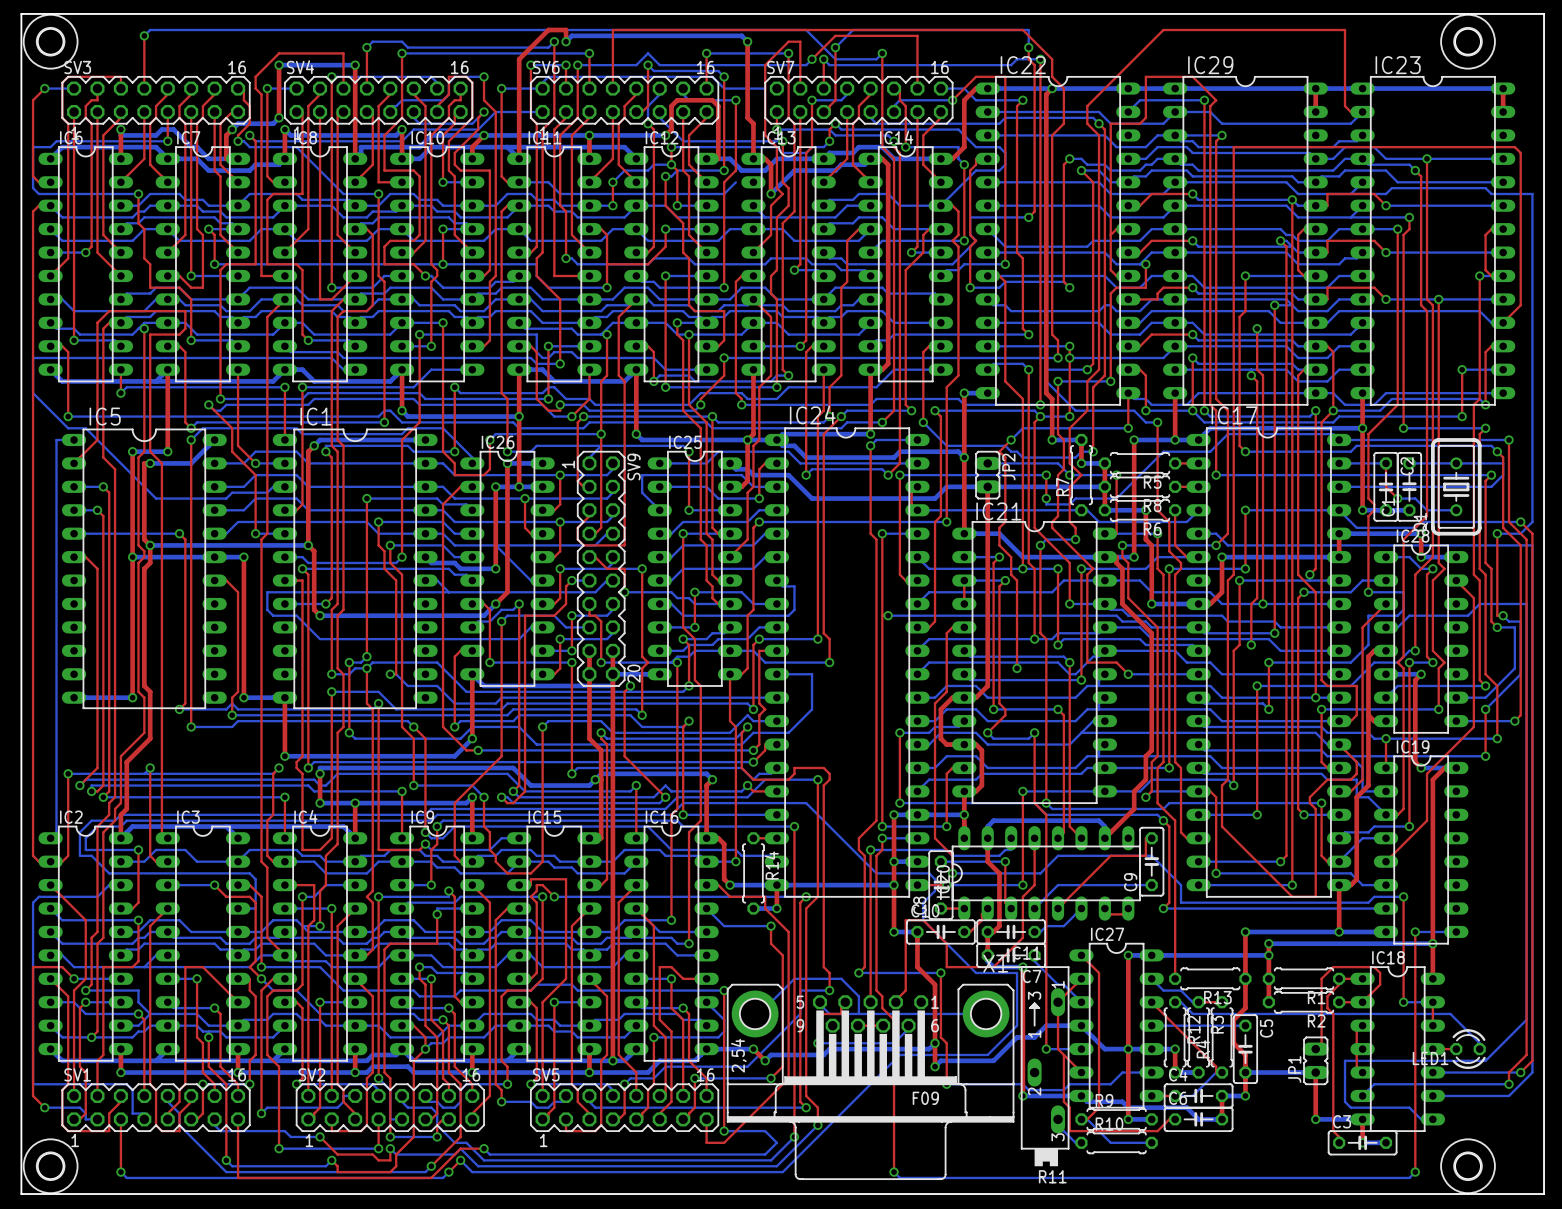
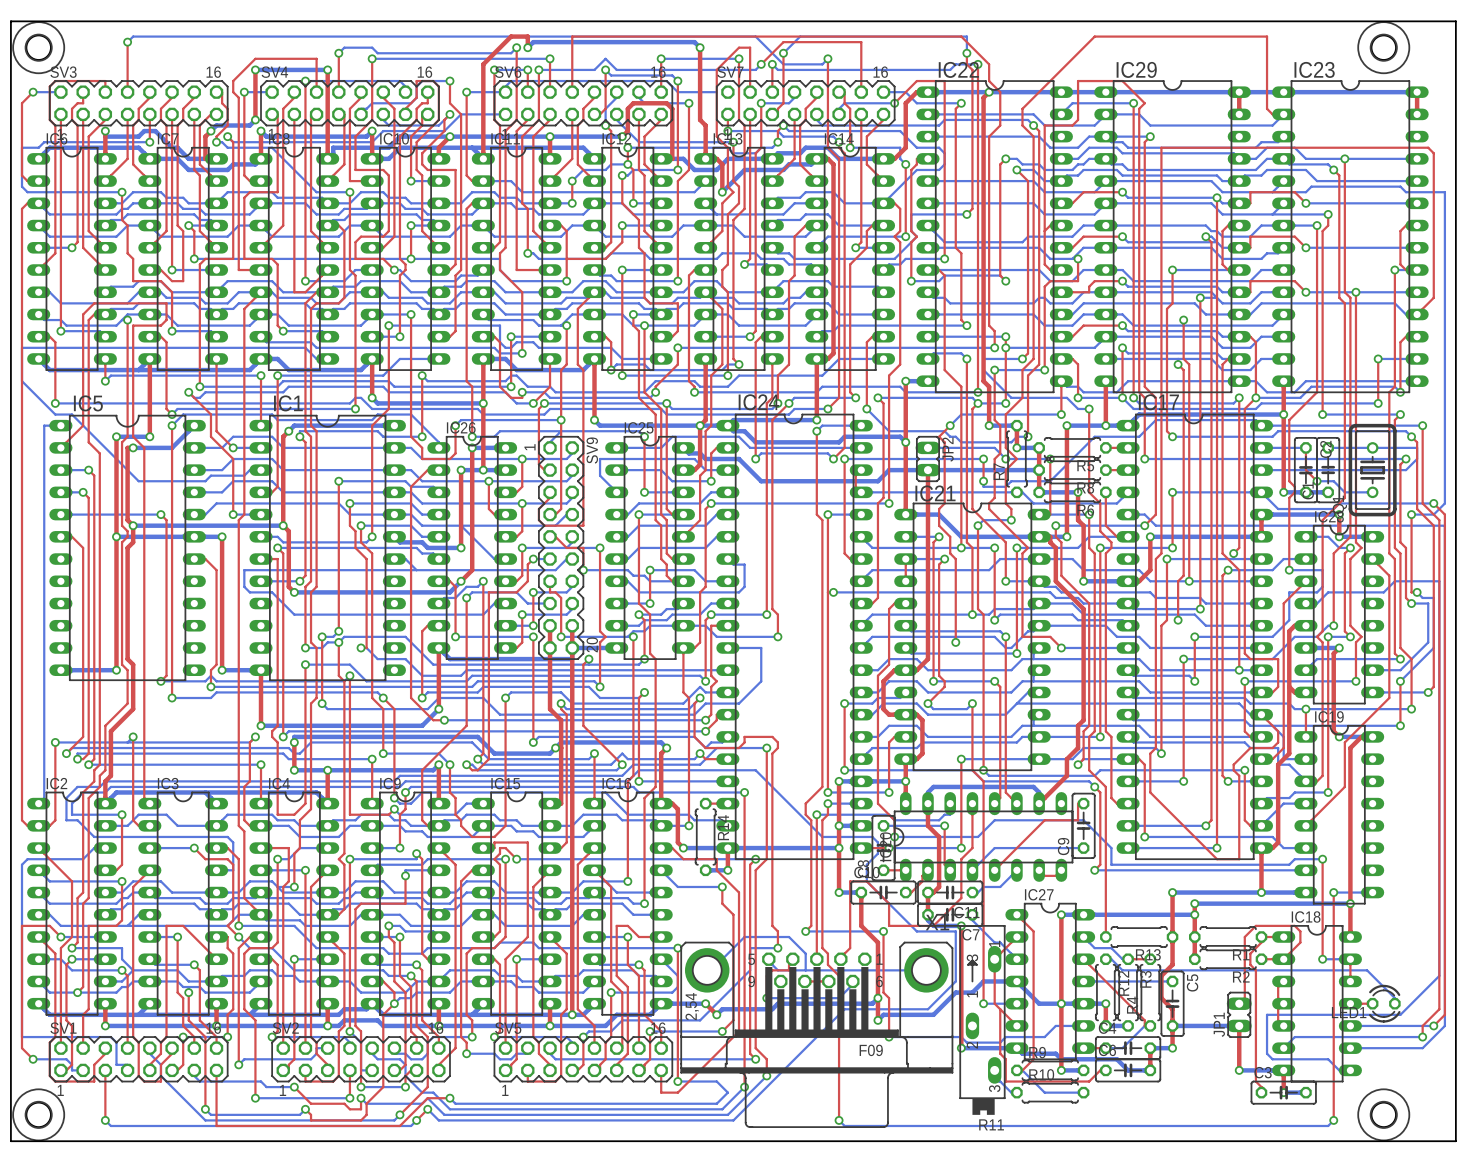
bottom track: (735, 182) (724, 193) -> (705, 181) (694, 192) (677, 192)

